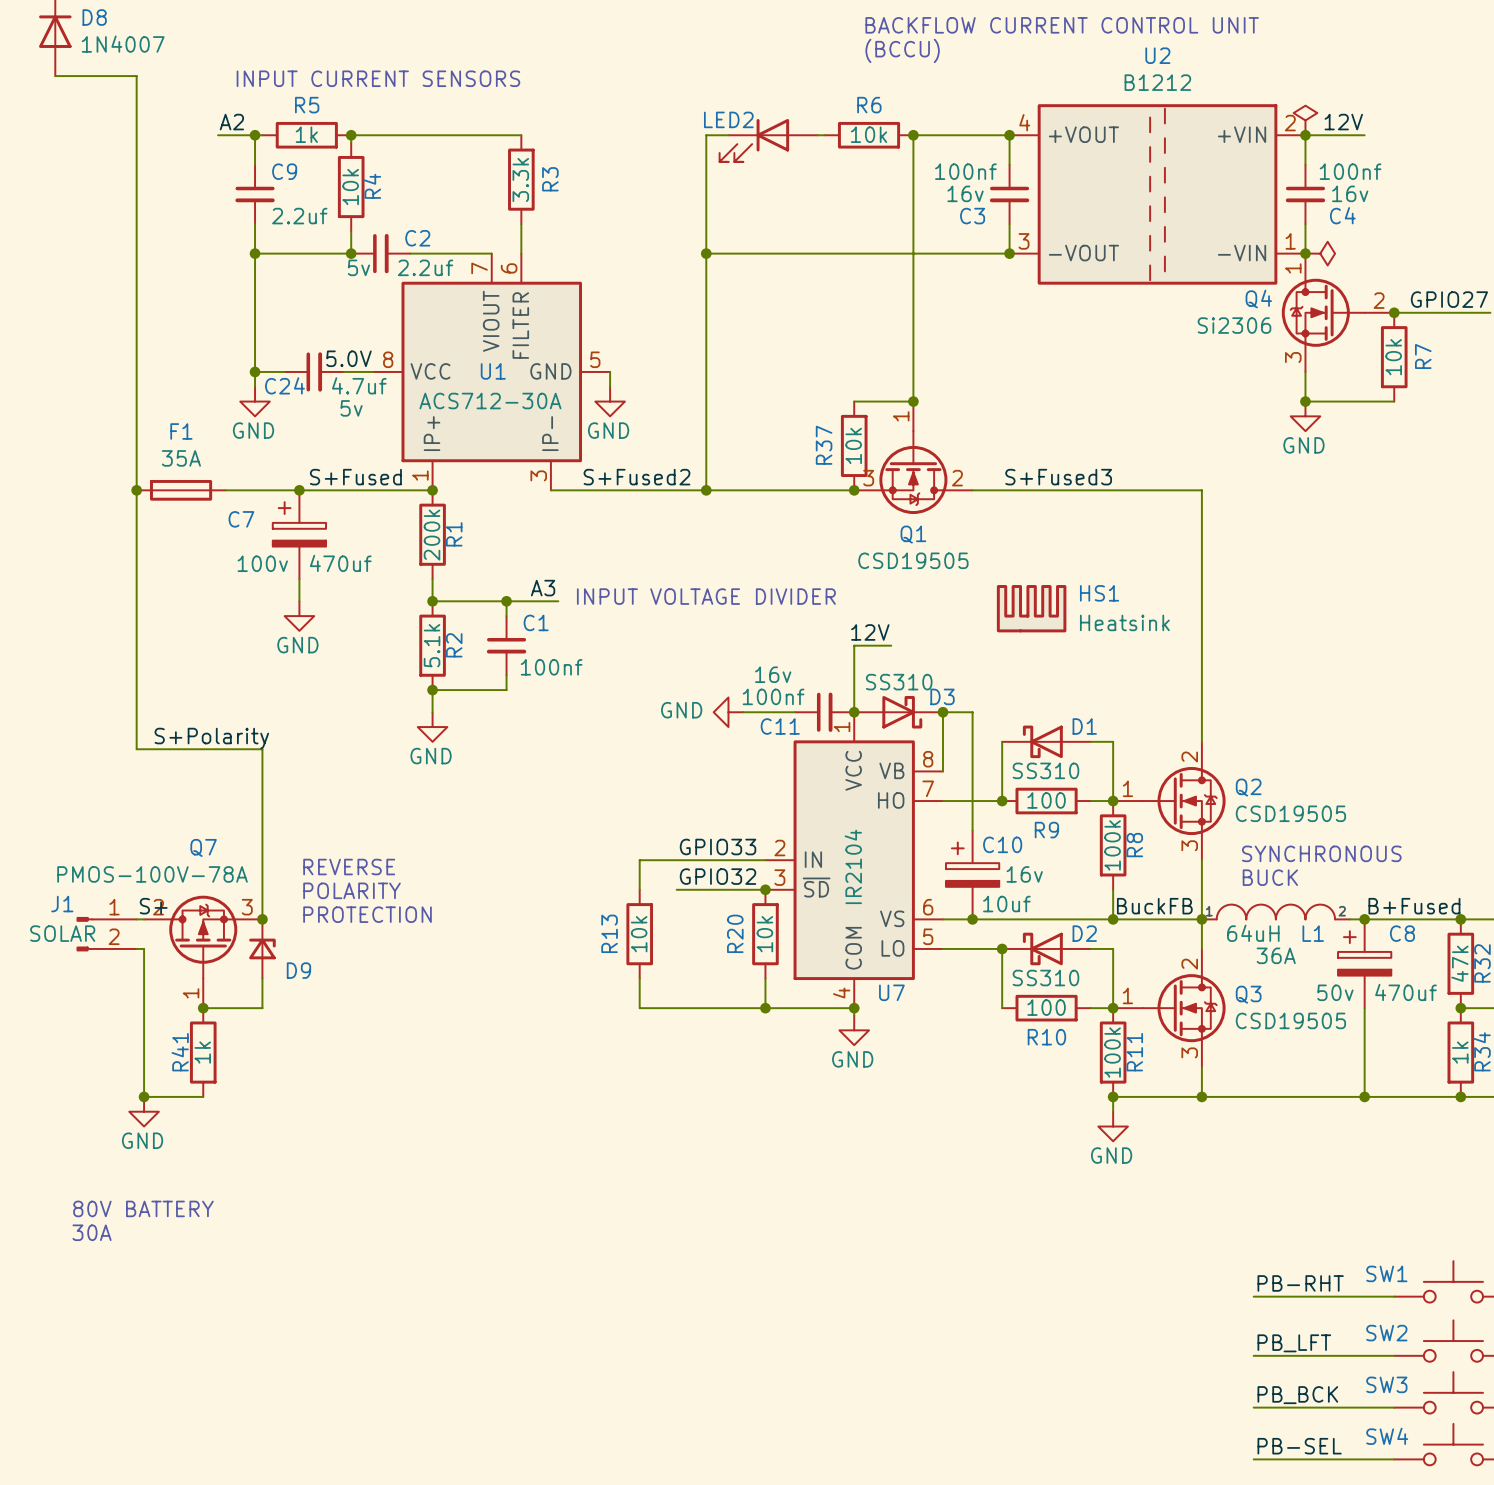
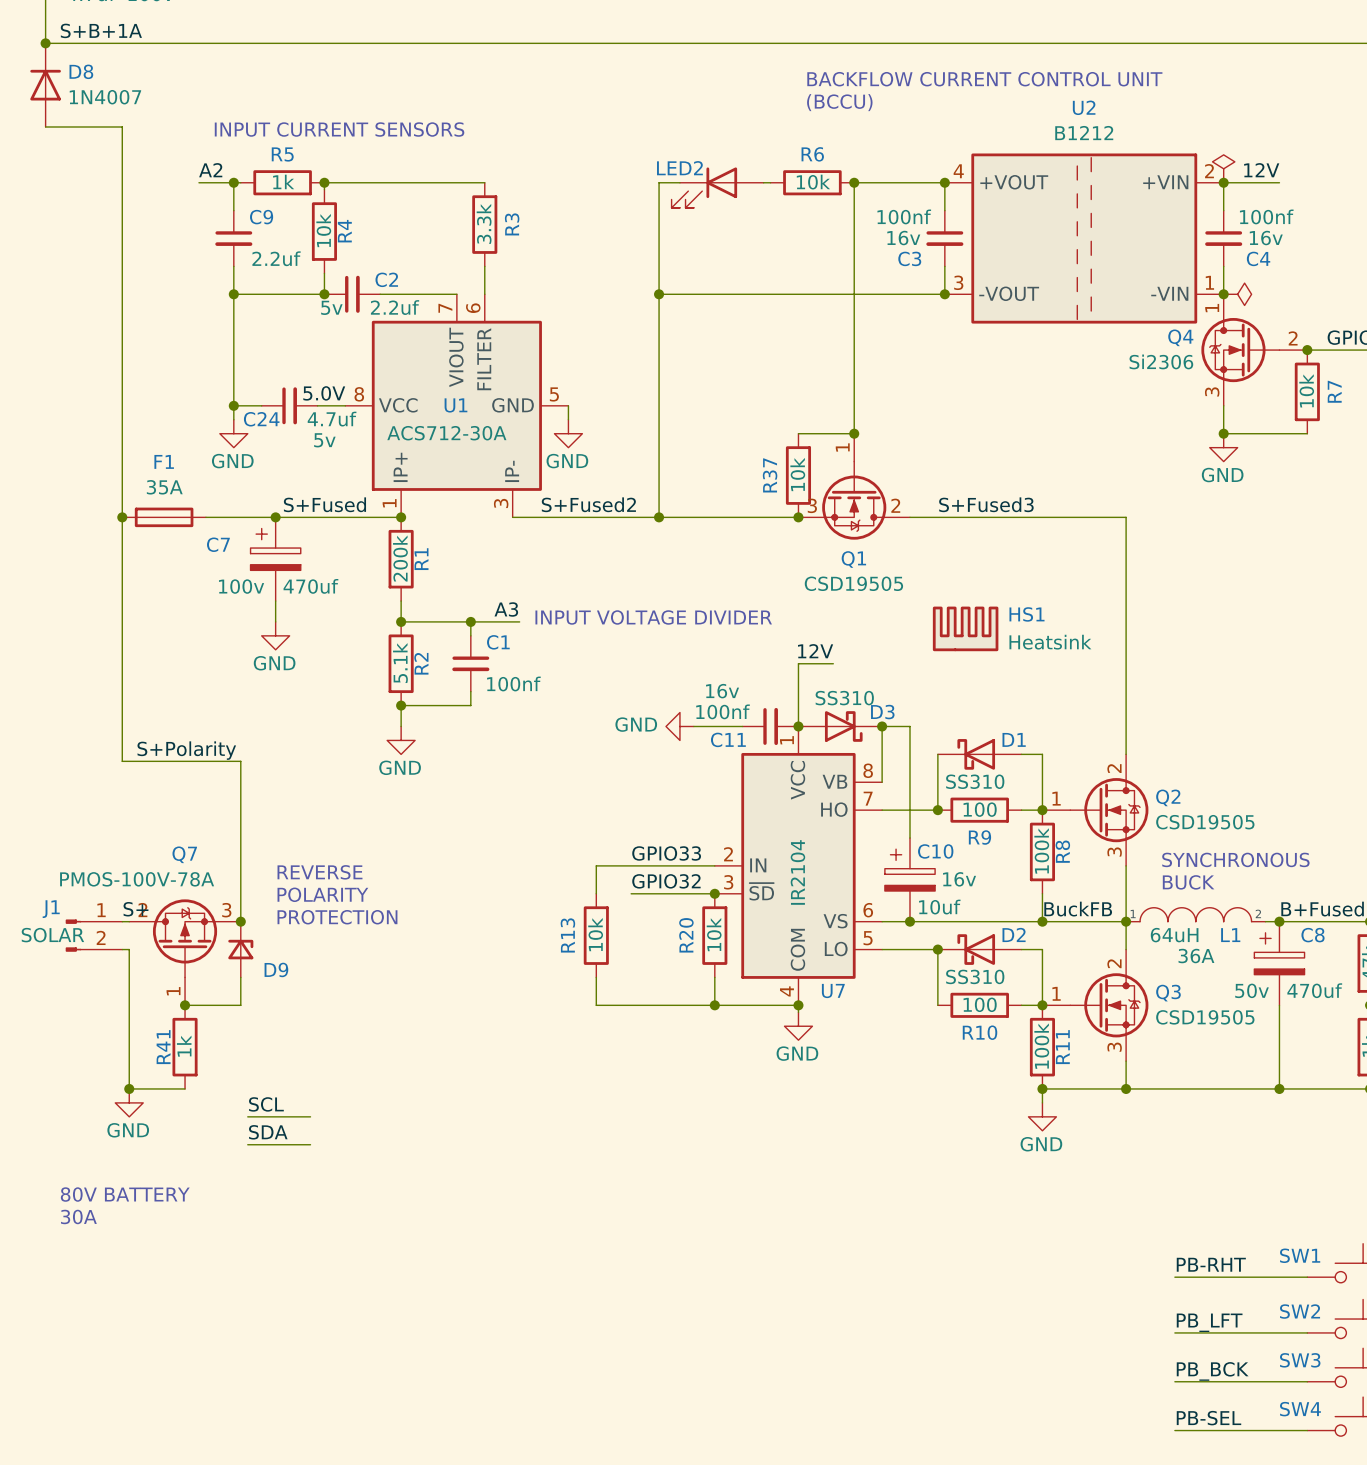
label: none -> SCL (266, 1104)
wire: none -> (247, 1116) (310, 1116)
label: none -> SDA (268, 1132)
wire: none -> (247, 1144) (310, 1144)

